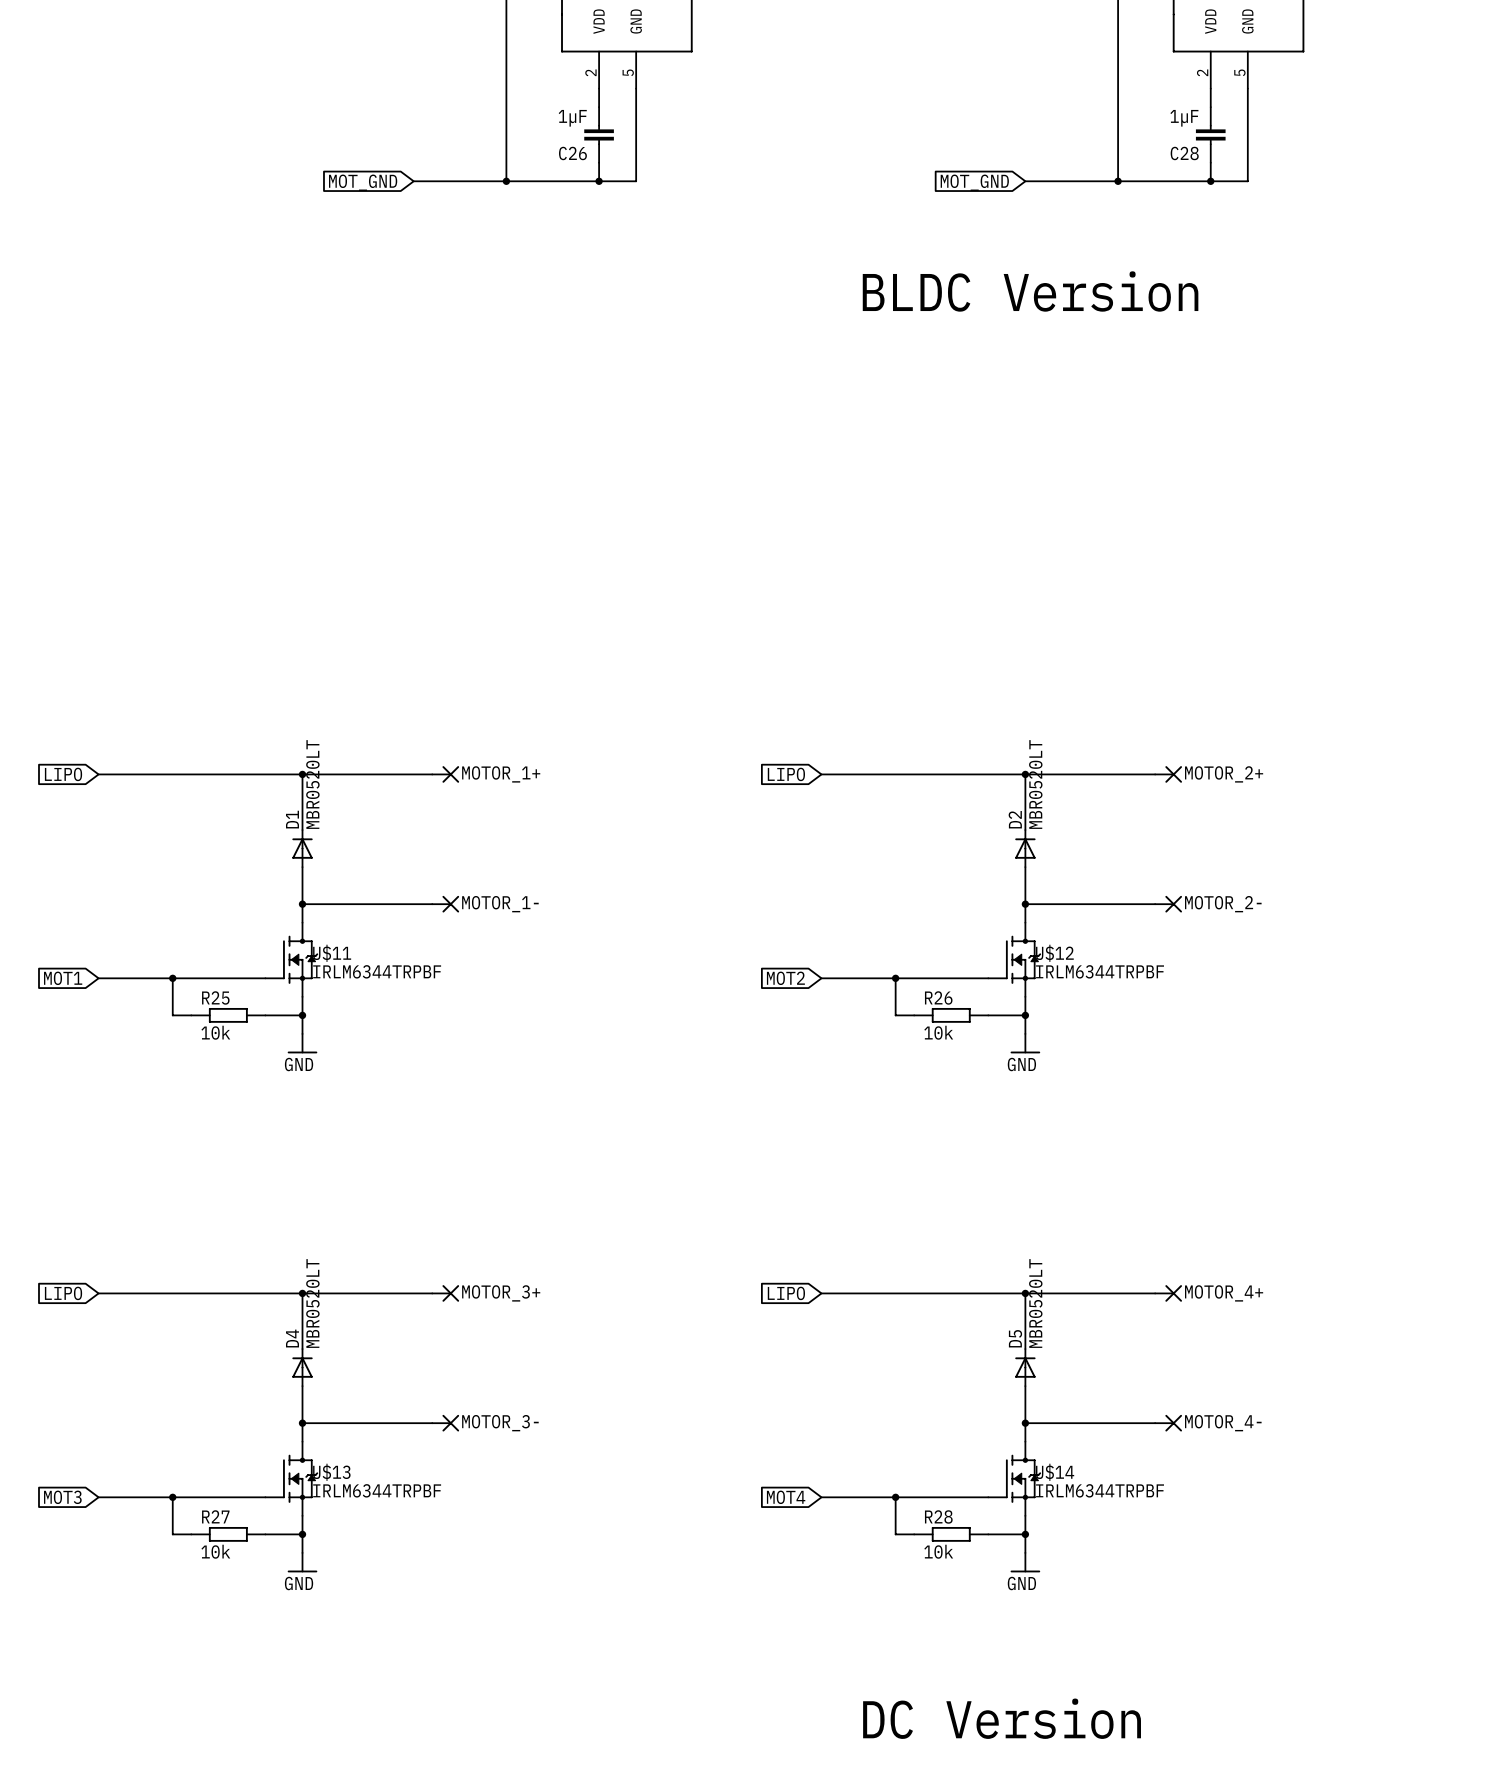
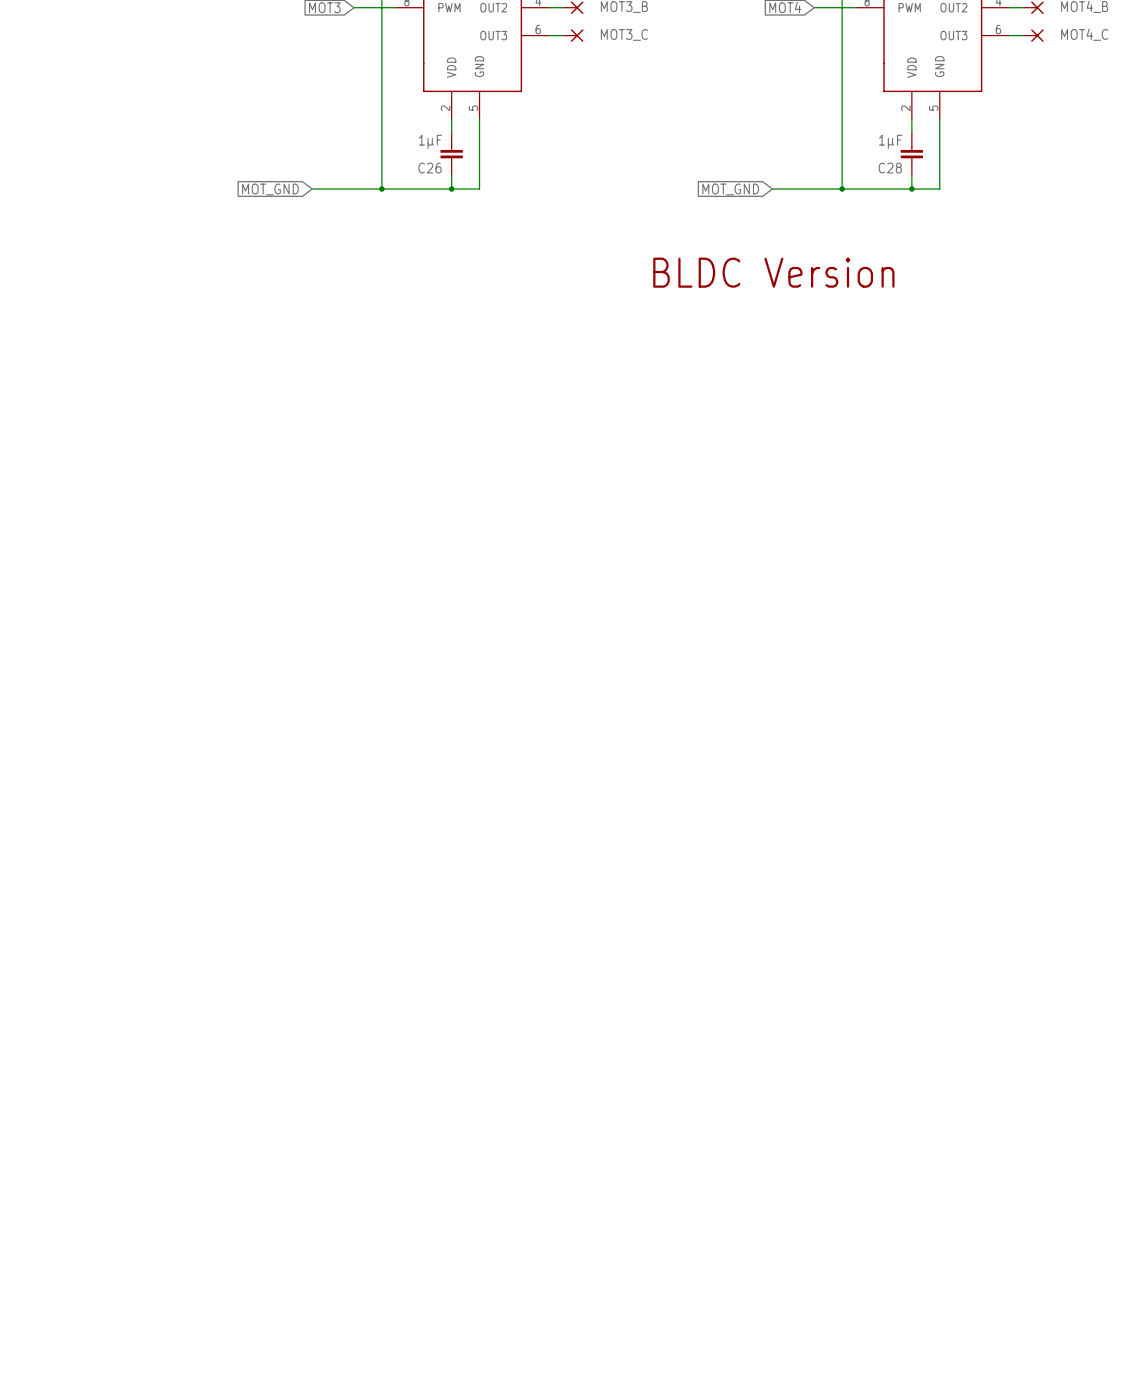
global label: LIPO (63, 774) -> none
wire: (98, 774) (432, 774) -> none
wire: (302, 774) (302, 830) -> none
junction: (302, 774) -> none
MOTOR_1+: (445, 774) -> none
global label: LIPO (786, 774) -> none
wire: (821, 774) (1155, 774) -> none
wire: (1025, 774) (1025, 830) -> none
junction: (1025, 774) -> none
MOTOR_2+: (1168, 774) -> none
D1: MBR0520LT (302, 848) -> none
D2: MBR0520LT (1025, 848) -> none
wire: (302, 867) (302, 922) -> none
wire: (1025, 867) (1025, 922) -> none
wire: (302, 904) (432, 904) -> none
junction: (302, 904) -> none
MOTOR_1-: (445, 904) -> none
wire: (1025, 904) (1155, 904) -> none
junction: (1025, 904) -> none
MOTOR_2-: (1168, 904) -> none
U$11: IRLM6344TRPBF (291, 959) -> none
U$12: IRLM6344TRPBF (1014, 959) -> none
global label: MOT1 (63, 978) -> none
wire: (98, 978) (265, 978) -> none
wire: (172, 978) (172, 1015) (191, 1015) -> none
junction: (172, 978) -> none
global label: MOT2 (785, 978) -> none
wire: (821, 978) (988, 978) -> none
wire: (895, 978) (895, 1015) (914, 1015) -> none
junction: (895, 978) -> none
wire: (302, 996) (302, 1033) -> none
wire: (1025, 996) (1025, 1033) -> none
R25: 10k (228, 1015) -> none
wire: (265, 1015) (302, 1015) -> none
junction: (302, 1015) -> none
R26: 10k (951, 1015) -> none
wire: (988, 1015) (1025, 1015) -> none
junction: (1025, 1015) -> none
power symbol: GND (302, 1043) -> none
power symbol: GND (1025, 1043) -> none
global label: LIPO (63, 1293) -> none
wire: (98, 1293) (432, 1293) -> none
wire: (302, 1293) (302, 1349) -> none
junction: (302, 1293) -> none
MOTOR_3+: (445, 1293) -> none
global label: LIPO (786, 1293) -> none
wire: (821, 1293) (1155, 1293) -> none
wire: (1025, 1293) (1025, 1349) -> none
junction: (1025, 1293) -> none
MOTOR_4+: (1168, 1293) -> none
D4: MBR0520LT (302, 1367) -> none
D5: MBR0520LT (1025, 1367) -> none
wire: (302, 1386) (302, 1441) -> none
wire: (1025, 1386) (1025, 1441) -> none
wire: (302, 1423) (432, 1423) -> none
junction: (302, 1423) -> none
MOTOR_3-: (445, 1423) -> none
wire: (1025, 1423) (1155, 1423) -> none
junction: (1025, 1423) -> none
MOTOR_4-: (1168, 1423) -> none
U$13: IRLM6344TRPBF (291, 1478) -> none
U$14: IRLM6344TRPBF (1014, 1478) -> none
global label: MOT3 (62, 1497) -> none
wire: (98, 1497) (265, 1497) -> none
wire: (172, 1497) (172, 1534) (191, 1534) -> none
junction: (172, 1497) -> none
global label: MOT4 (786, 1497) -> none
wire: (821, 1497) (988, 1497) -> none
wire: (895, 1497) (895, 1534) (914, 1534) -> none
junction: (895, 1497) -> none
wire: (302, 1515) (302, 1552) -> none
wire: (1025, 1515) (1025, 1552) -> none
R27: 10k (228, 1534) -> none
wire: (265, 1534) (302, 1534) -> none
junction: (302, 1534) -> none
R28: 10k (951, 1534) -> none
wire: (988, 1534) (1025, 1534) -> none
junction: (1025, 1534) -> none
power symbol: GND (302, 1562) -> none
power symbol: GND (1025, 1562) -> none
text: DC Version (1002, 1718) -> none

